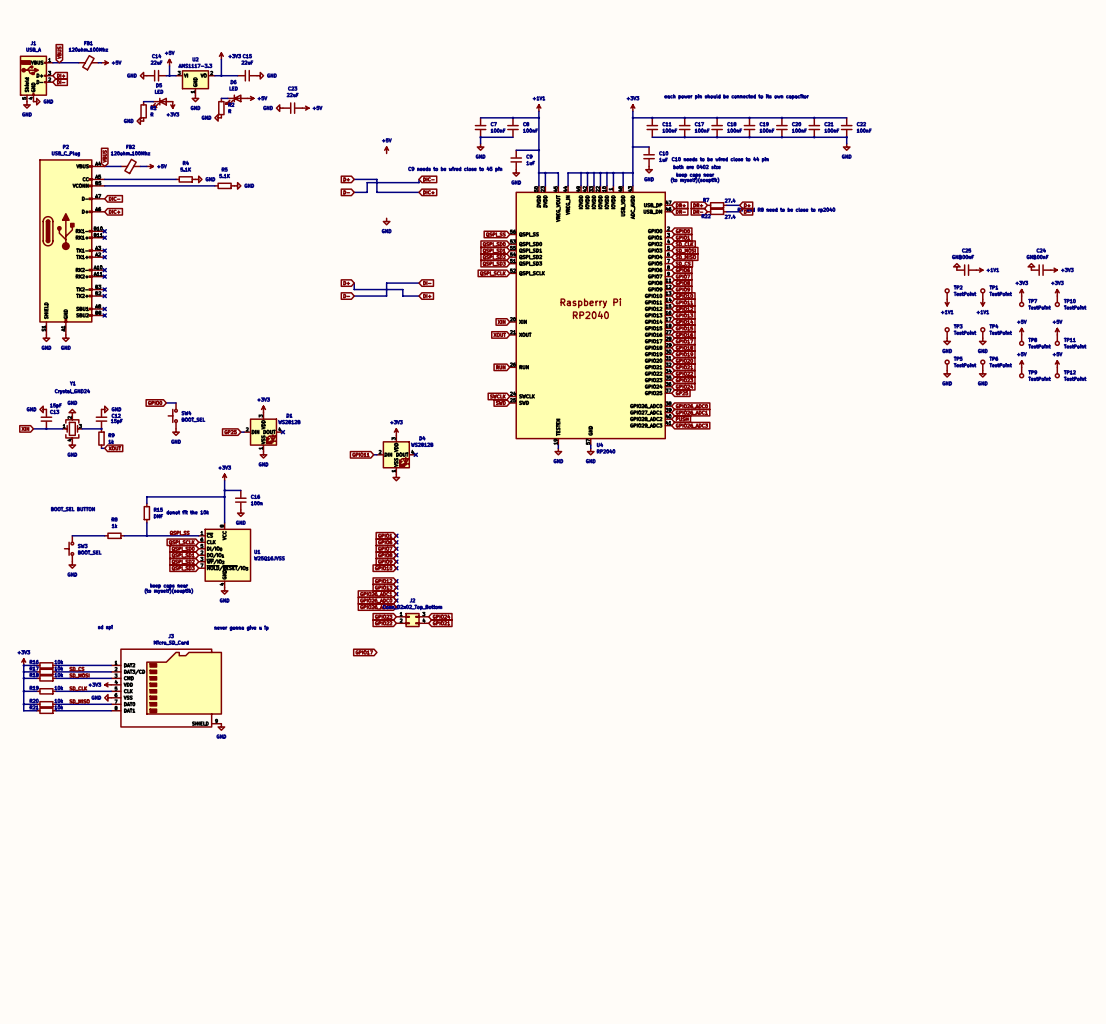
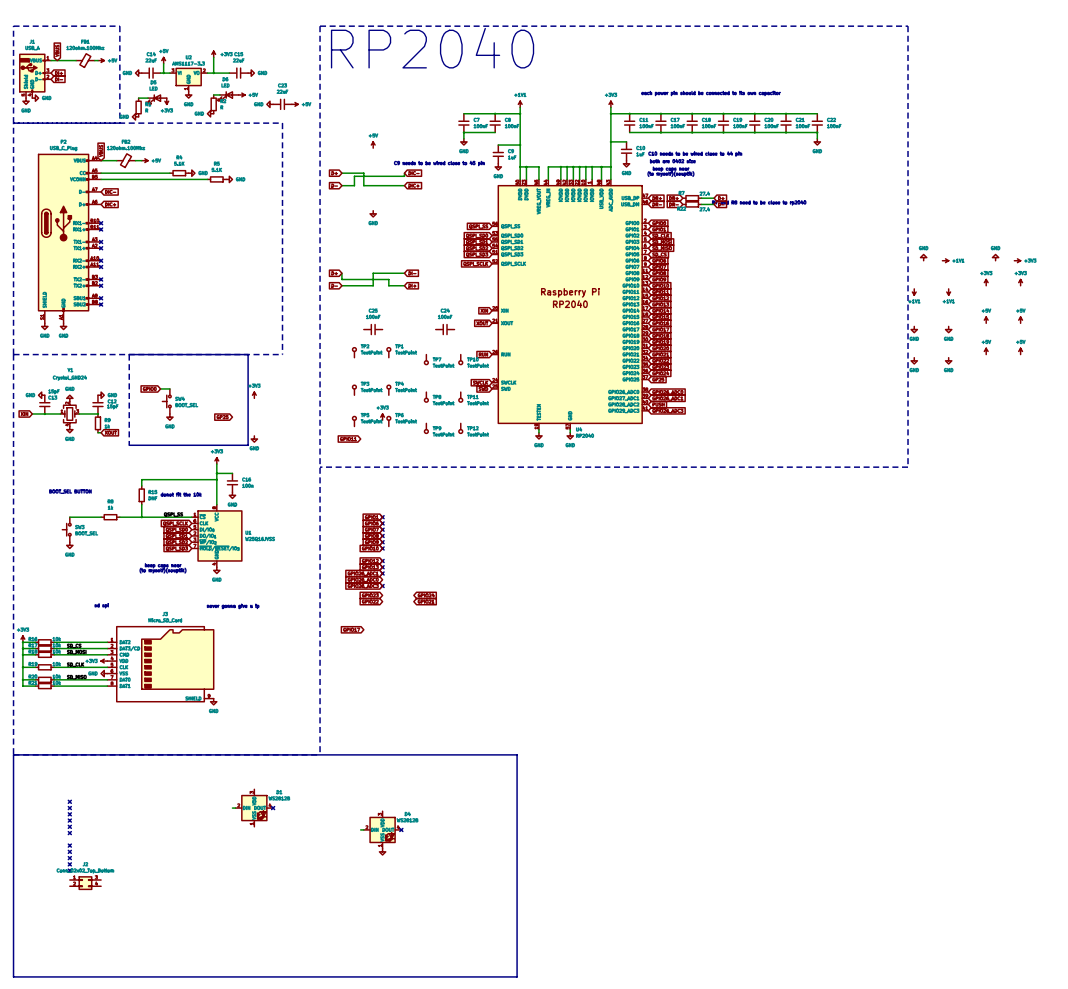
text: none -> RP2040 (432, 48)
line: none -> (13, 123) (282, 123) (282, 354) (13, 354)
line: none -> (119, 123) (119, 26) (13, 26) (13, 754)
part position: (966, 270) -> (373, 329)
part position: (1041, 270) -> (445, 329)
part position: (947, 294) -> (354, 352)
part position: (982, 294) -> (388, 352)
part position: (1021, 301) -> (426, 359)
part position: (1057, 301) -> (460, 359)
part position: (947, 332) -> (354, 390)
part position: (982, 332) -> (388, 390)
part position: (1021, 340) -> (426, 397)
part position: (1057, 340) -> (460, 397)
part position: (947, 365) -> (354, 421)
part position: (982, 365) -> (388, 421)
line: none -> (129, 354) (129, 445) (248, 445) (248, 354) (129, 354)
part position: (1021, 372) -> (426, 428)
part position: (1057, 372) -> (460, 428)
wire: (240, 432) (244, 432) -> none
part position: (263, 432) -> (254, 808)
no-connect mark: (282, 432) -> none
wire: (373, 454) (376, 454) -> none
part position: (396, 454) -> (382, 829)
no-connect mark: (415, 454) -> none
power symbol: (396, 477) -> none
line: none -> (320, 467) (908, 467) (908, 26) (320, 26) (320, 754) (13, 754)
no-connect mark: (396, 600) -> none
part position: (412, 620) -> (85, 883)
line: none -> (13, 754) (13, 976) (517, 976) (517, 754) (13, 754)
no-connect mark: none -> (69, 801)
no-connect mark: none -> (69, 808)
wire: none -> (232, 808) (235, 808)
no-connect mark: none -> (273, 808)
no-connect mark: none -> (69, 814)
no-connect mark: none -> (69, 820)
no-connect mark: none -> (69, 826)
wire: none -> (360, 829) (363, 829)
no-connect mark: none -> (401, 829)
no-connect mark: none -> (69, 833)
no-connect mark: none -> (69, 845)
no-connect mark: none -> (69, 851)
power symbol: none -> (382, 851)
no-connect mark: none -> (69, 858)
no-connect mark: none -> (69, 864)
no-connect mark: none -> (69, 870)

